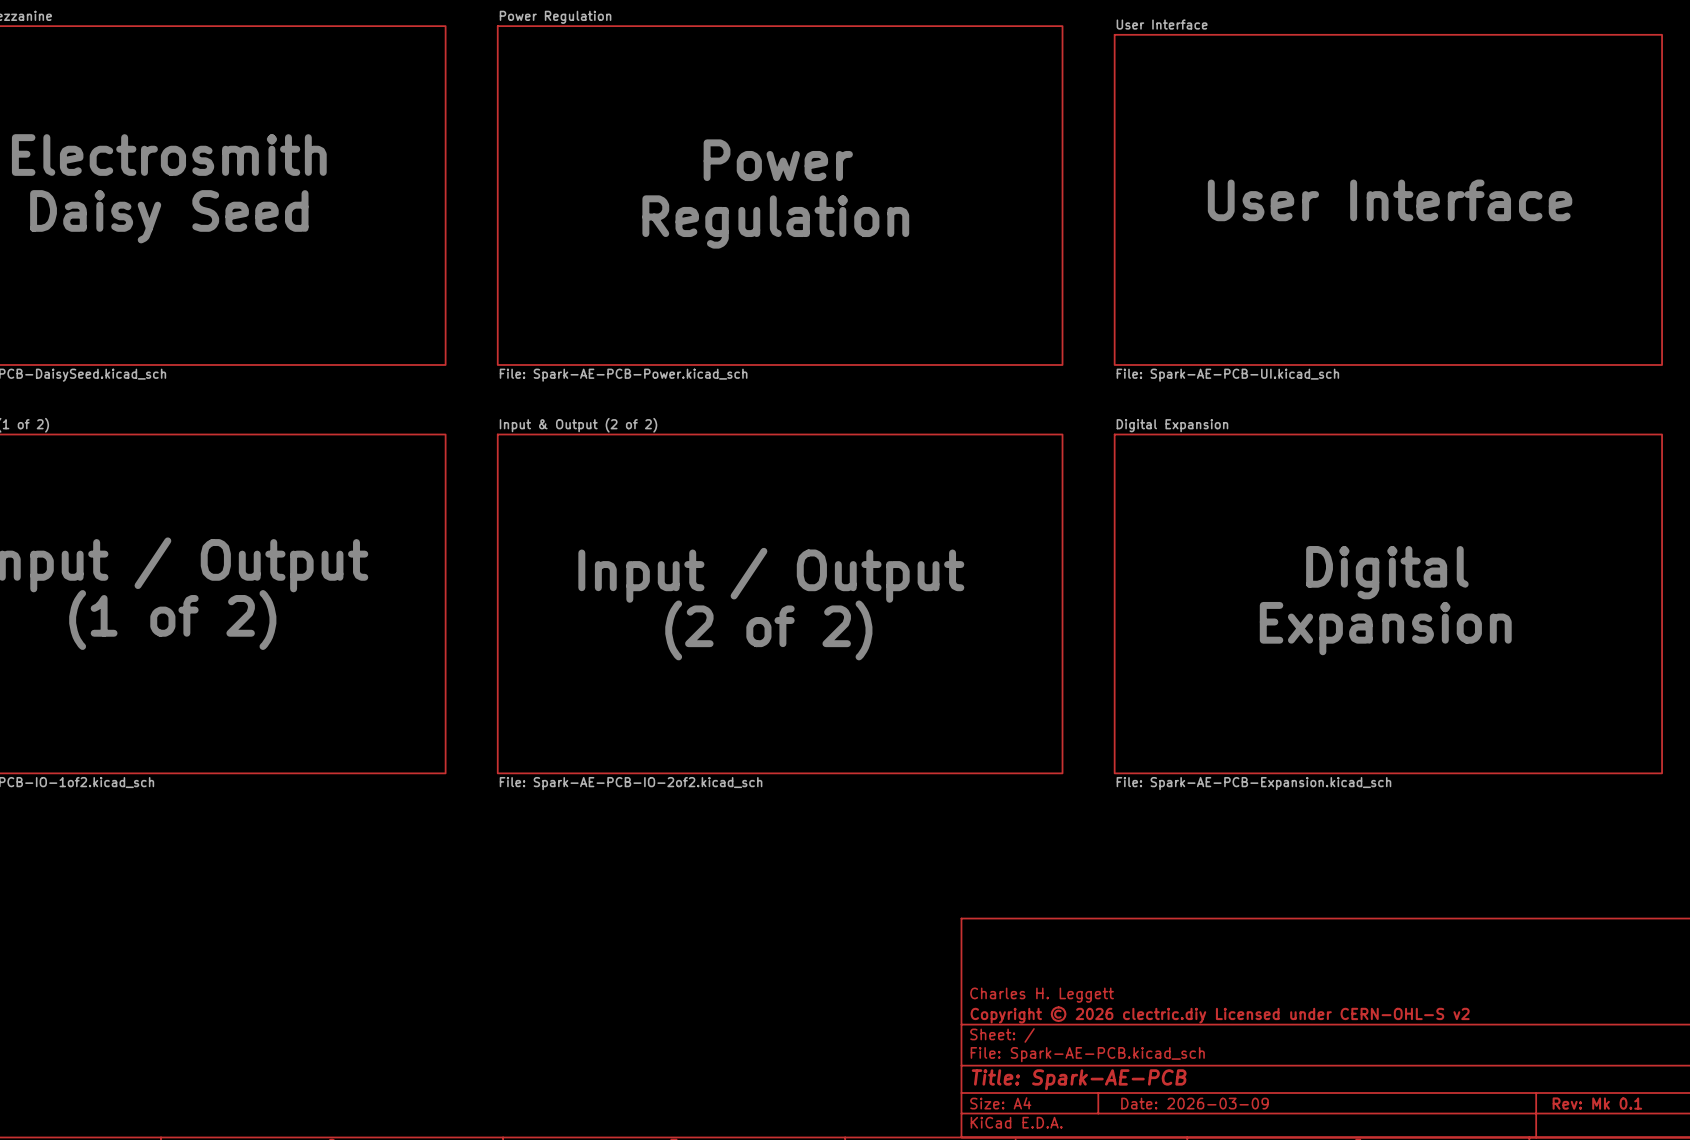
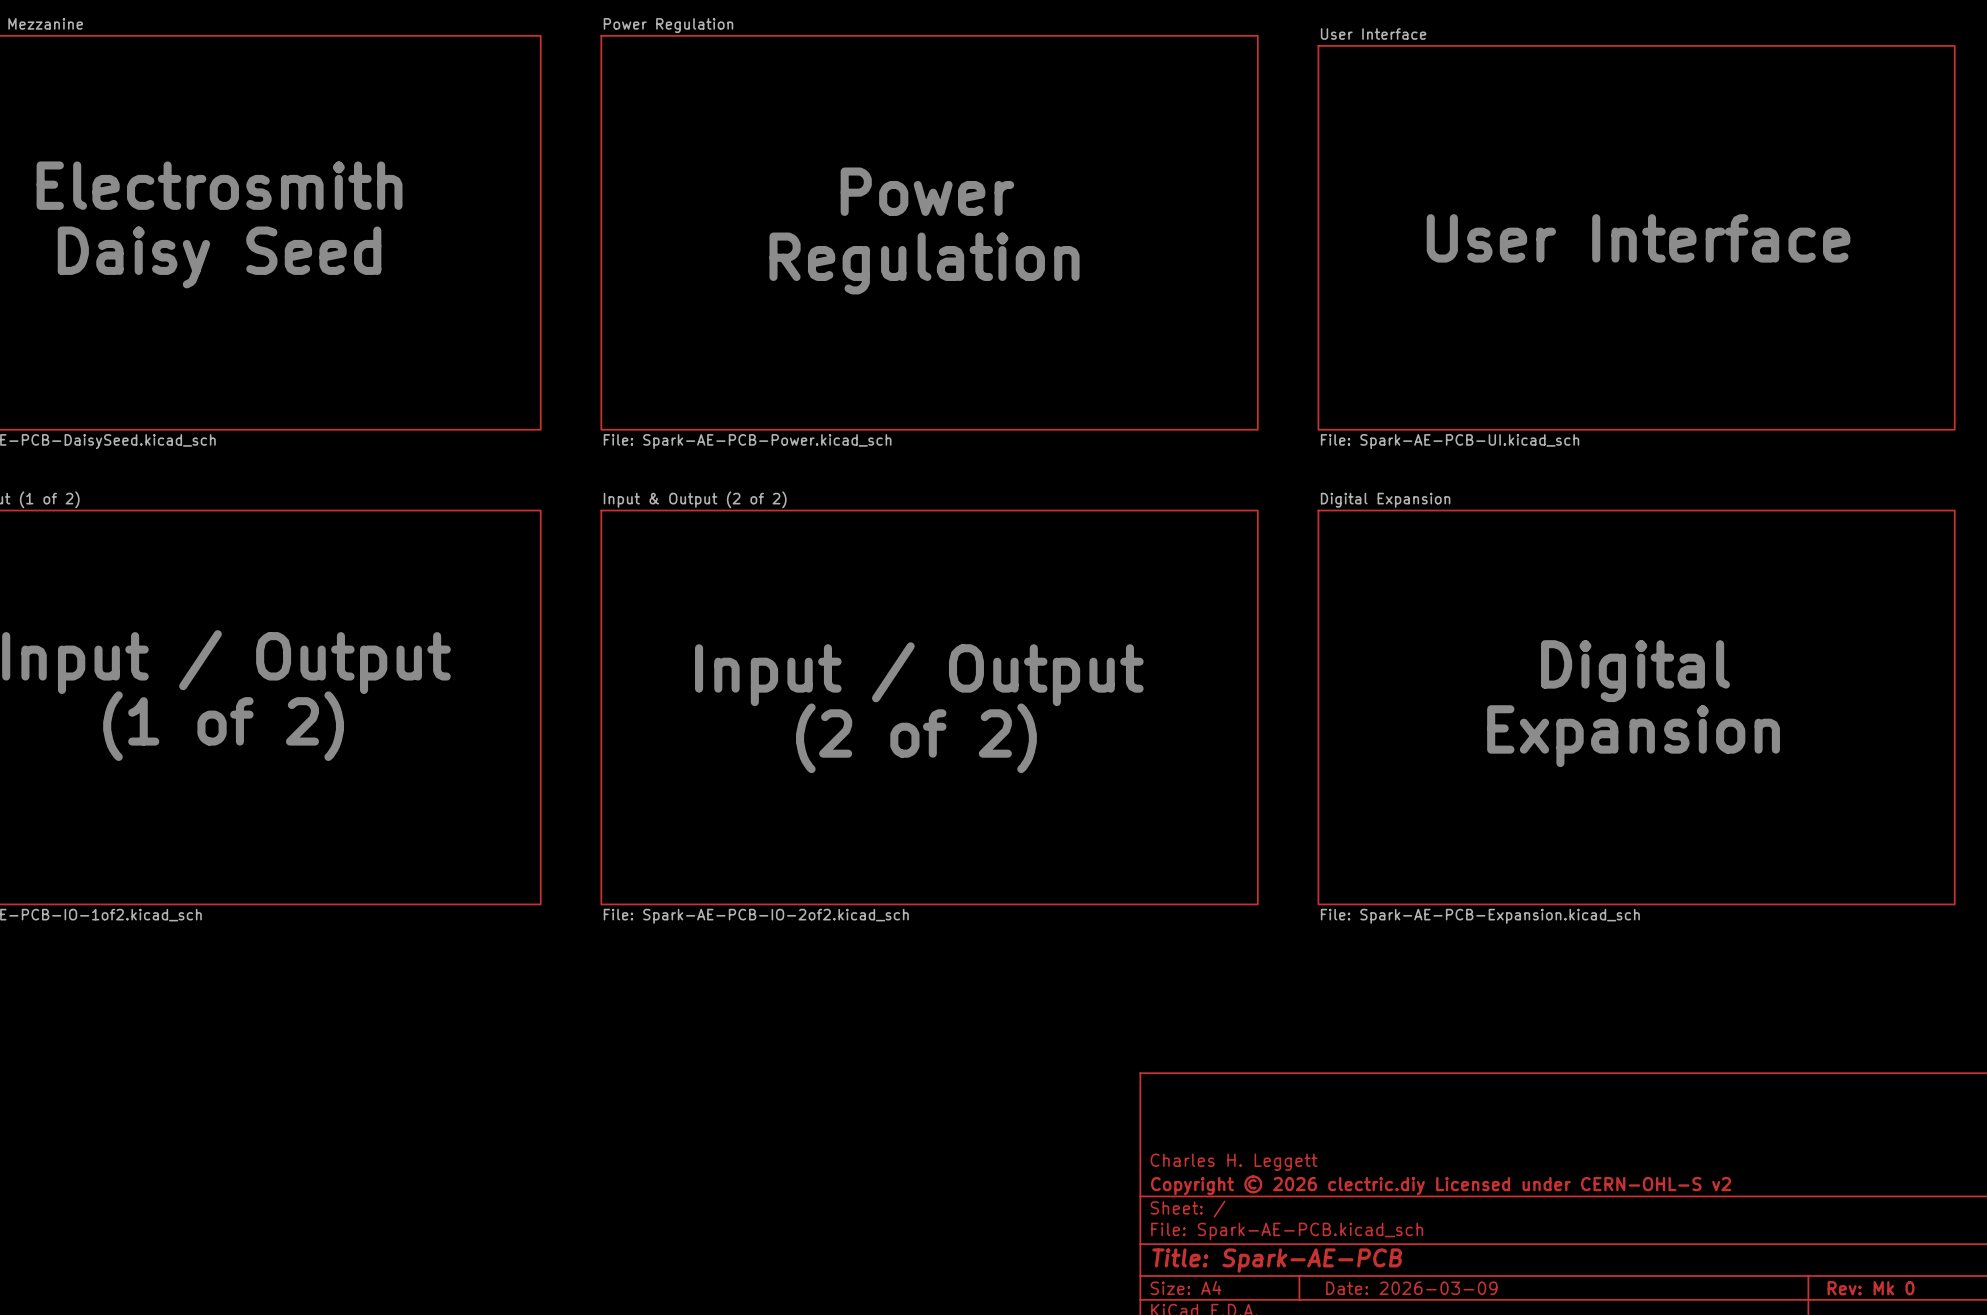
title block: Rev: Mk 0.1 (1597, 1103) -> Rev: Mk 0 (1871, 1288)

